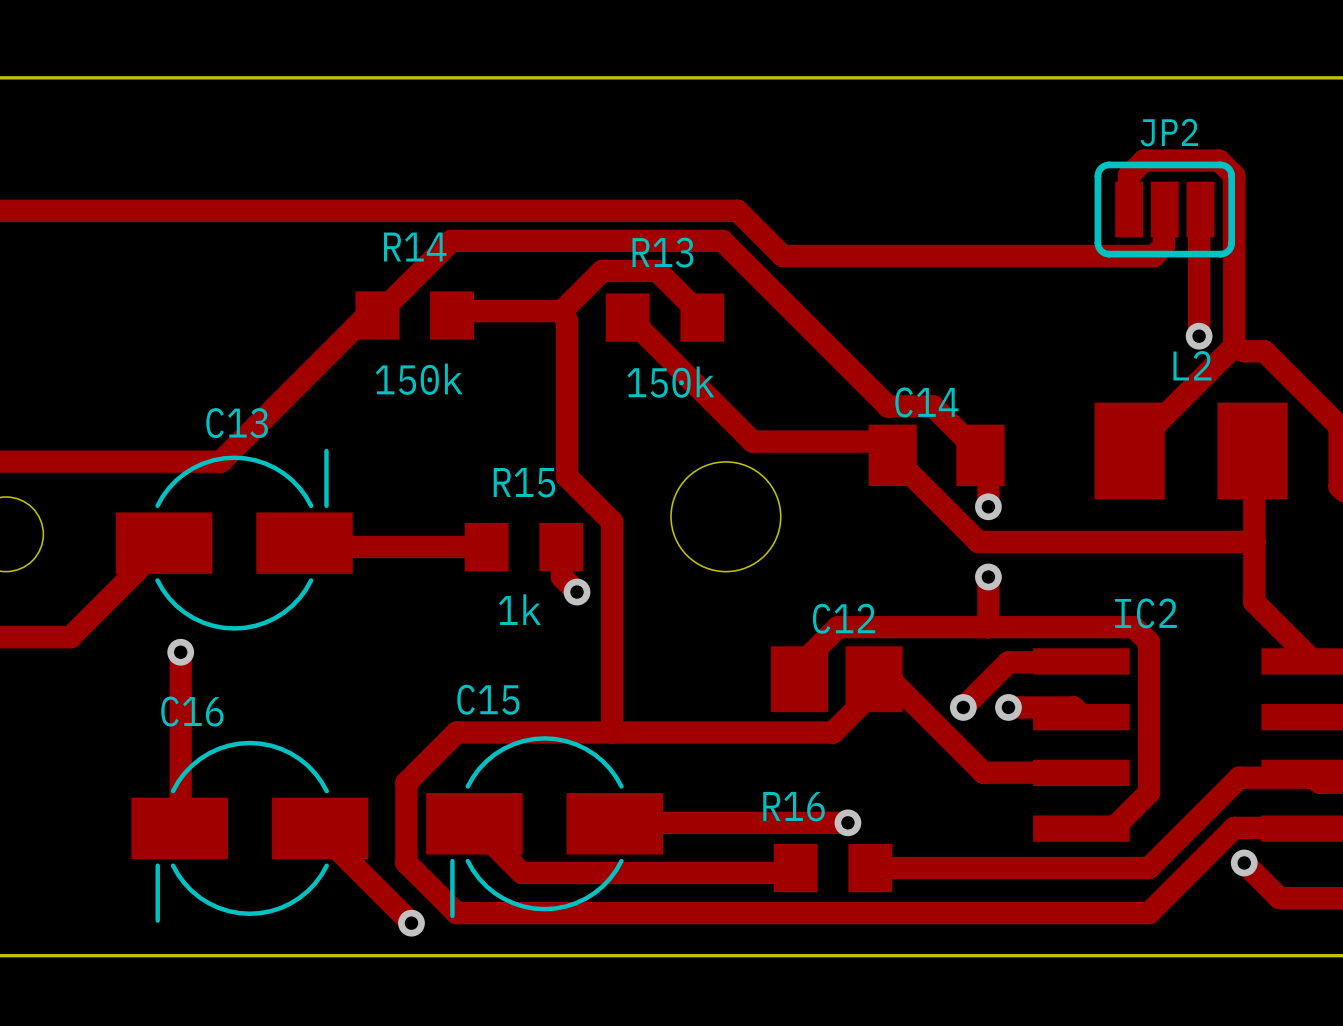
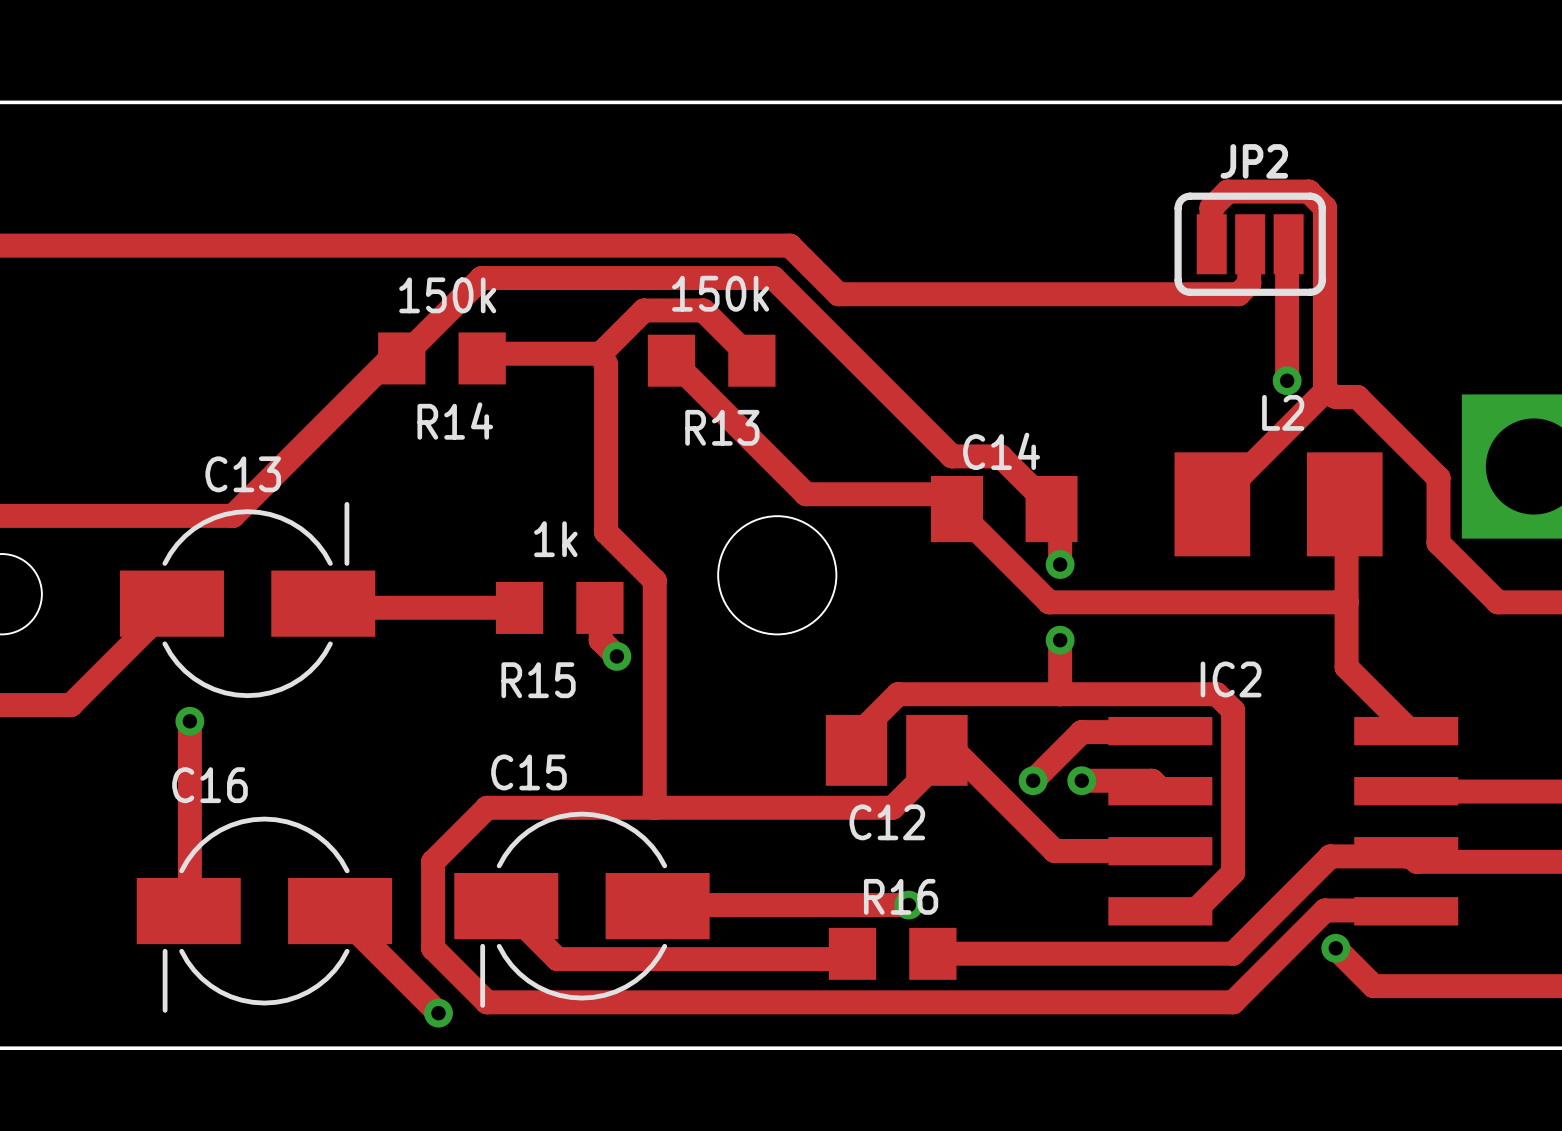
R14 name position: R14 (415, 247) -> R14 (455, 421)
R13 name position: R13 (662, 252) -> R13 (722, 427)
R14 value position: 150k (419, 379) -> 150k (447, 295)
R13 value position: 150k (670, 382) -> 150k (720, 293)
R15 name position: R15 (524, 482) -> R15 (538, 680)
R15 value position: 1k (519, 609) -> 1k (555, 539)
C12 name position: C12 (844, 618) -> C12 (887, 822)
R16 name position: R16 (794, 806) -> R16 (901, 896)

